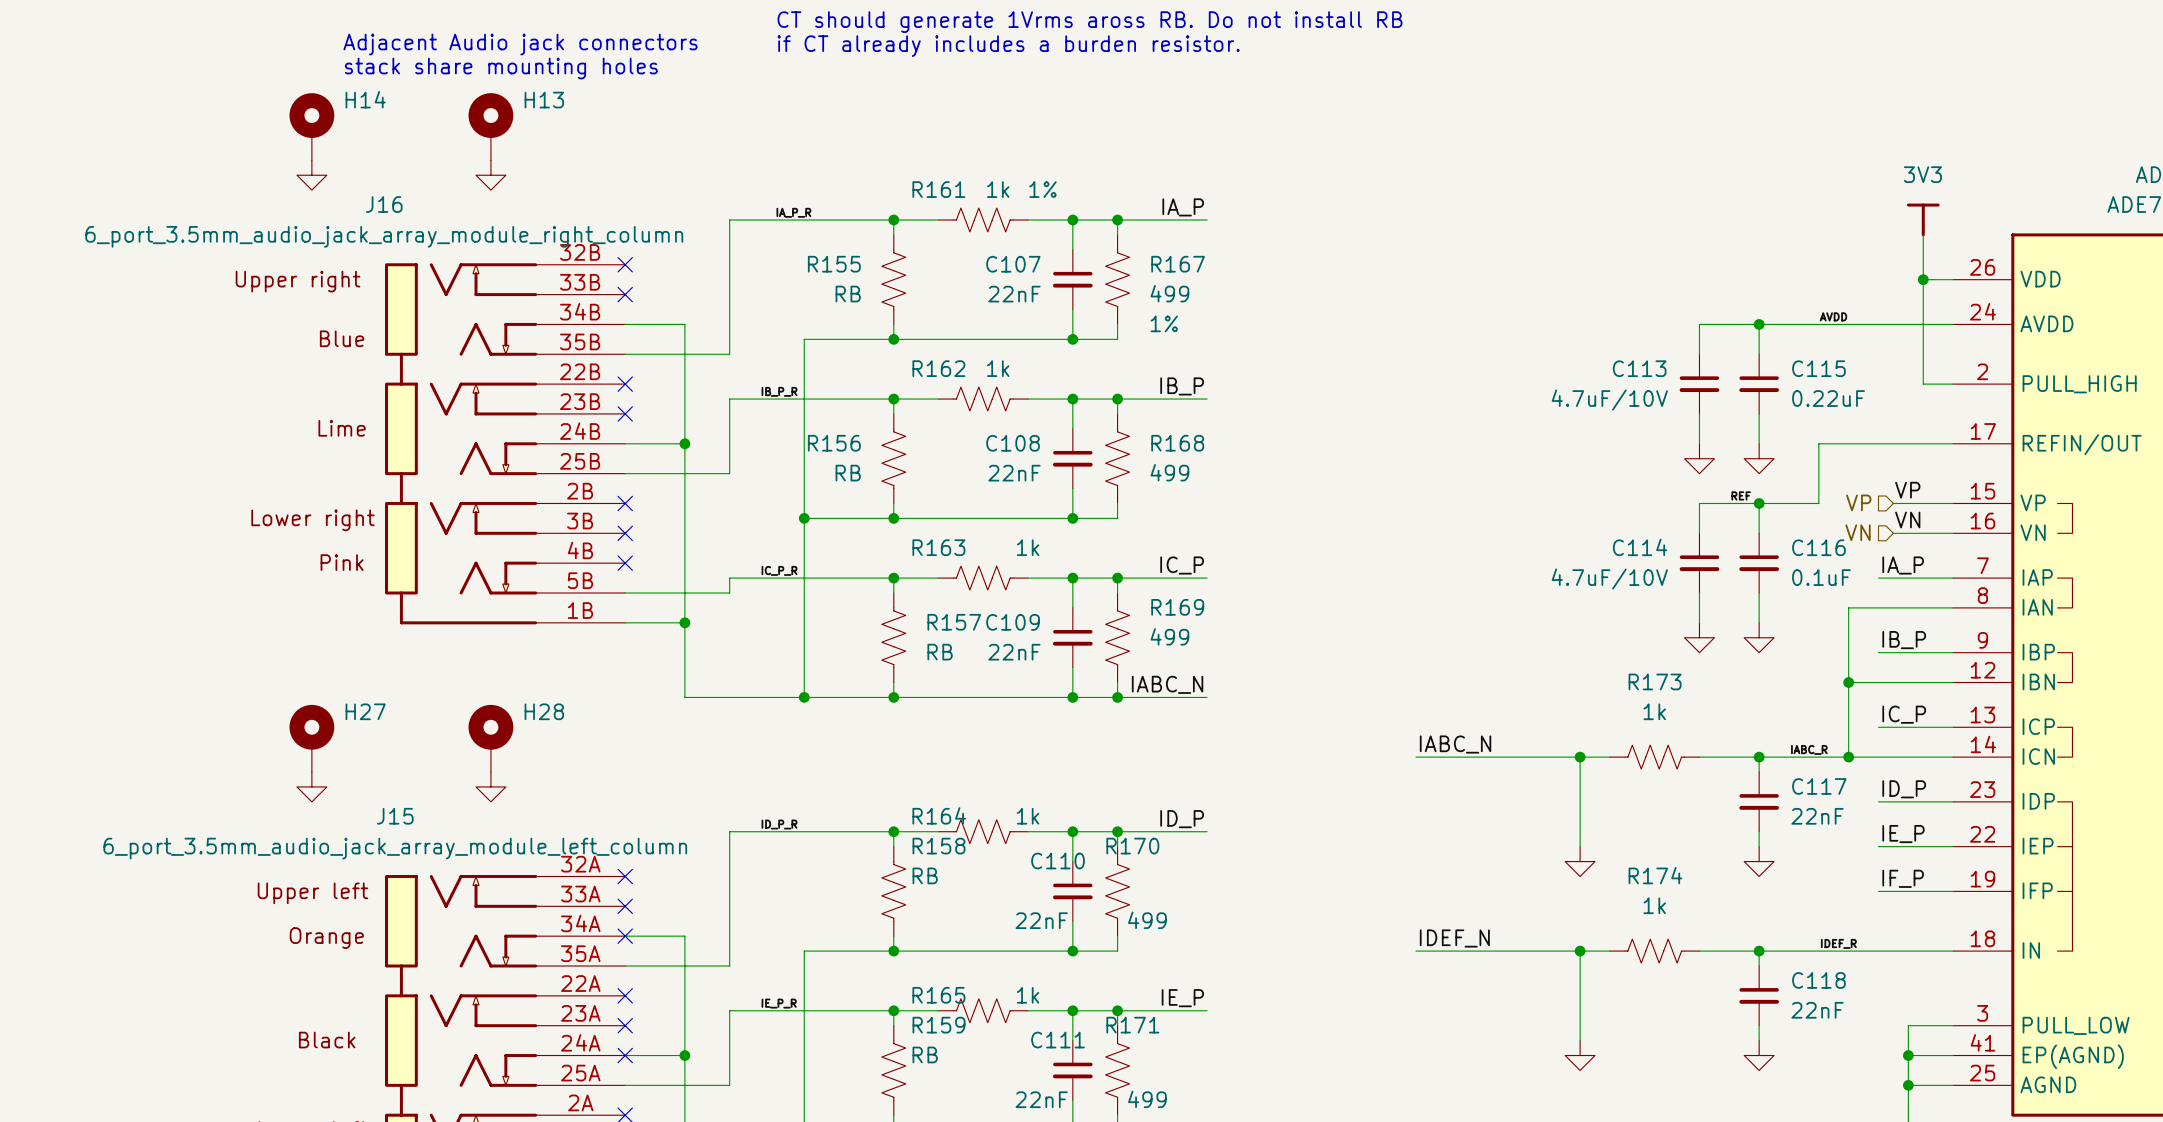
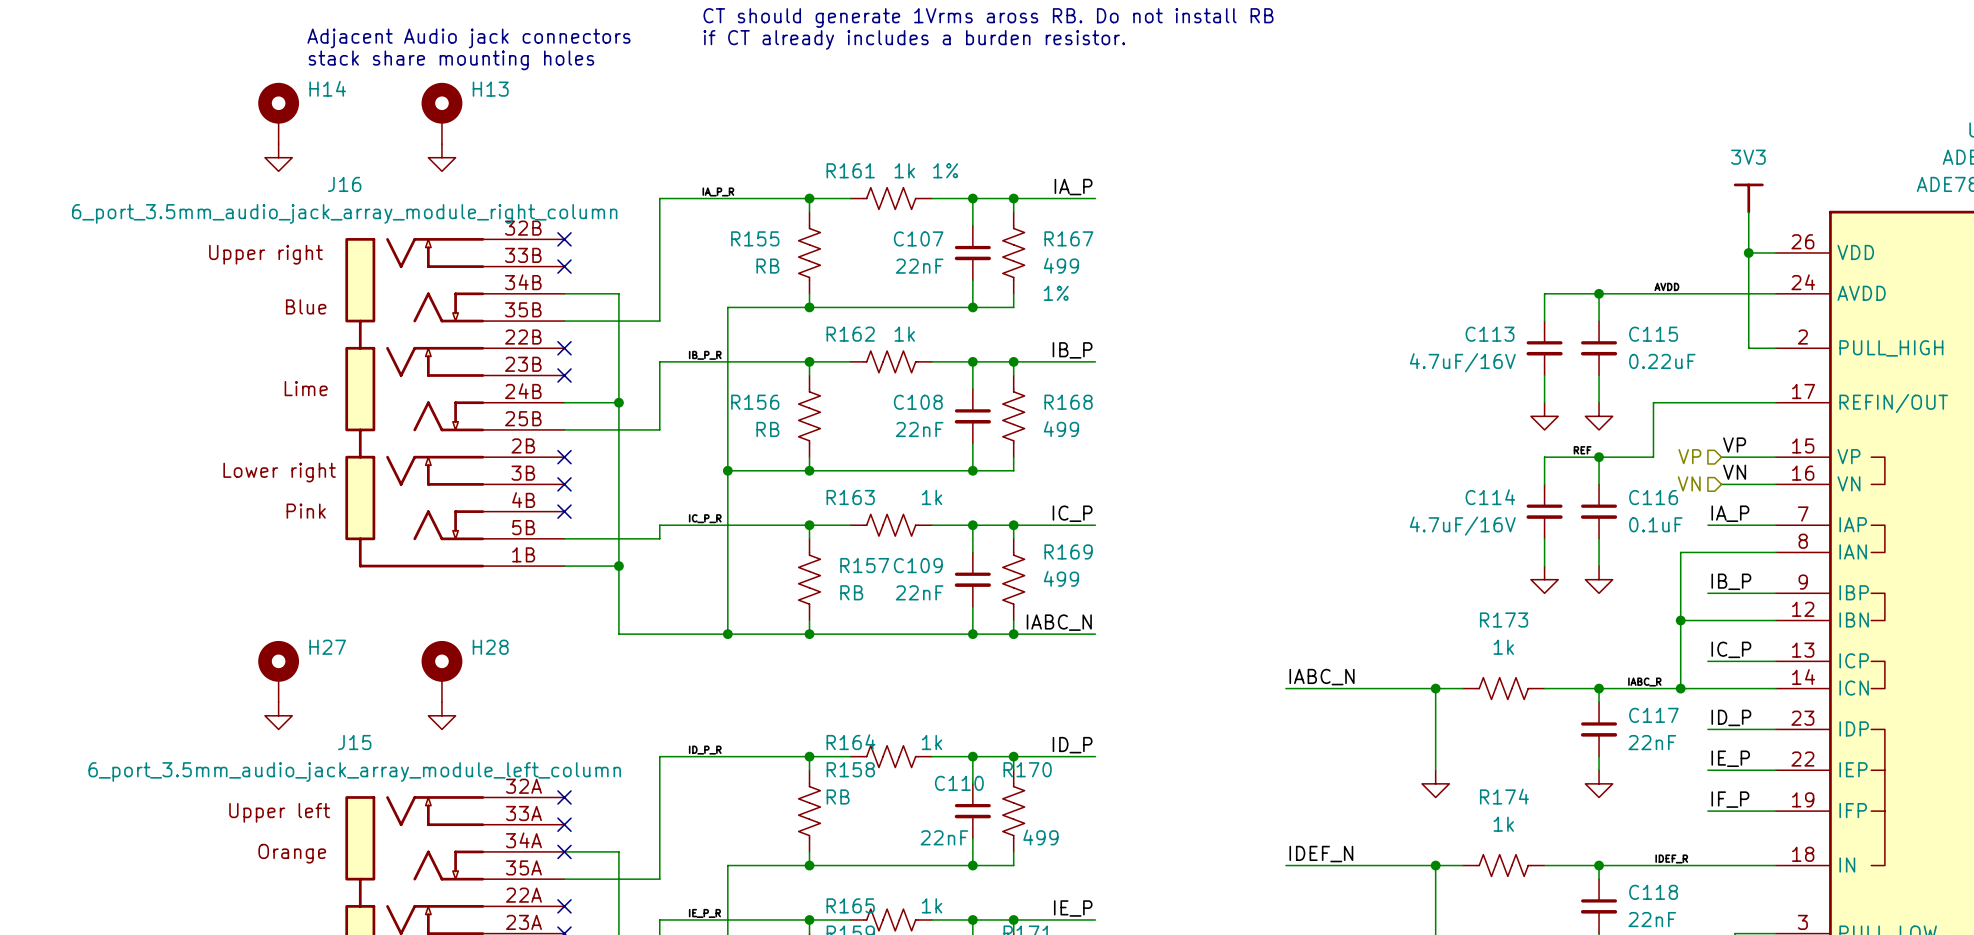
C113 value: 4.7uF/10V (1609, 399) -> 4.7uF/16V (1462, 362)
C114 value: 4.7uF/10V (1609, 579) -> 4.7uF/16V (1462, 526)

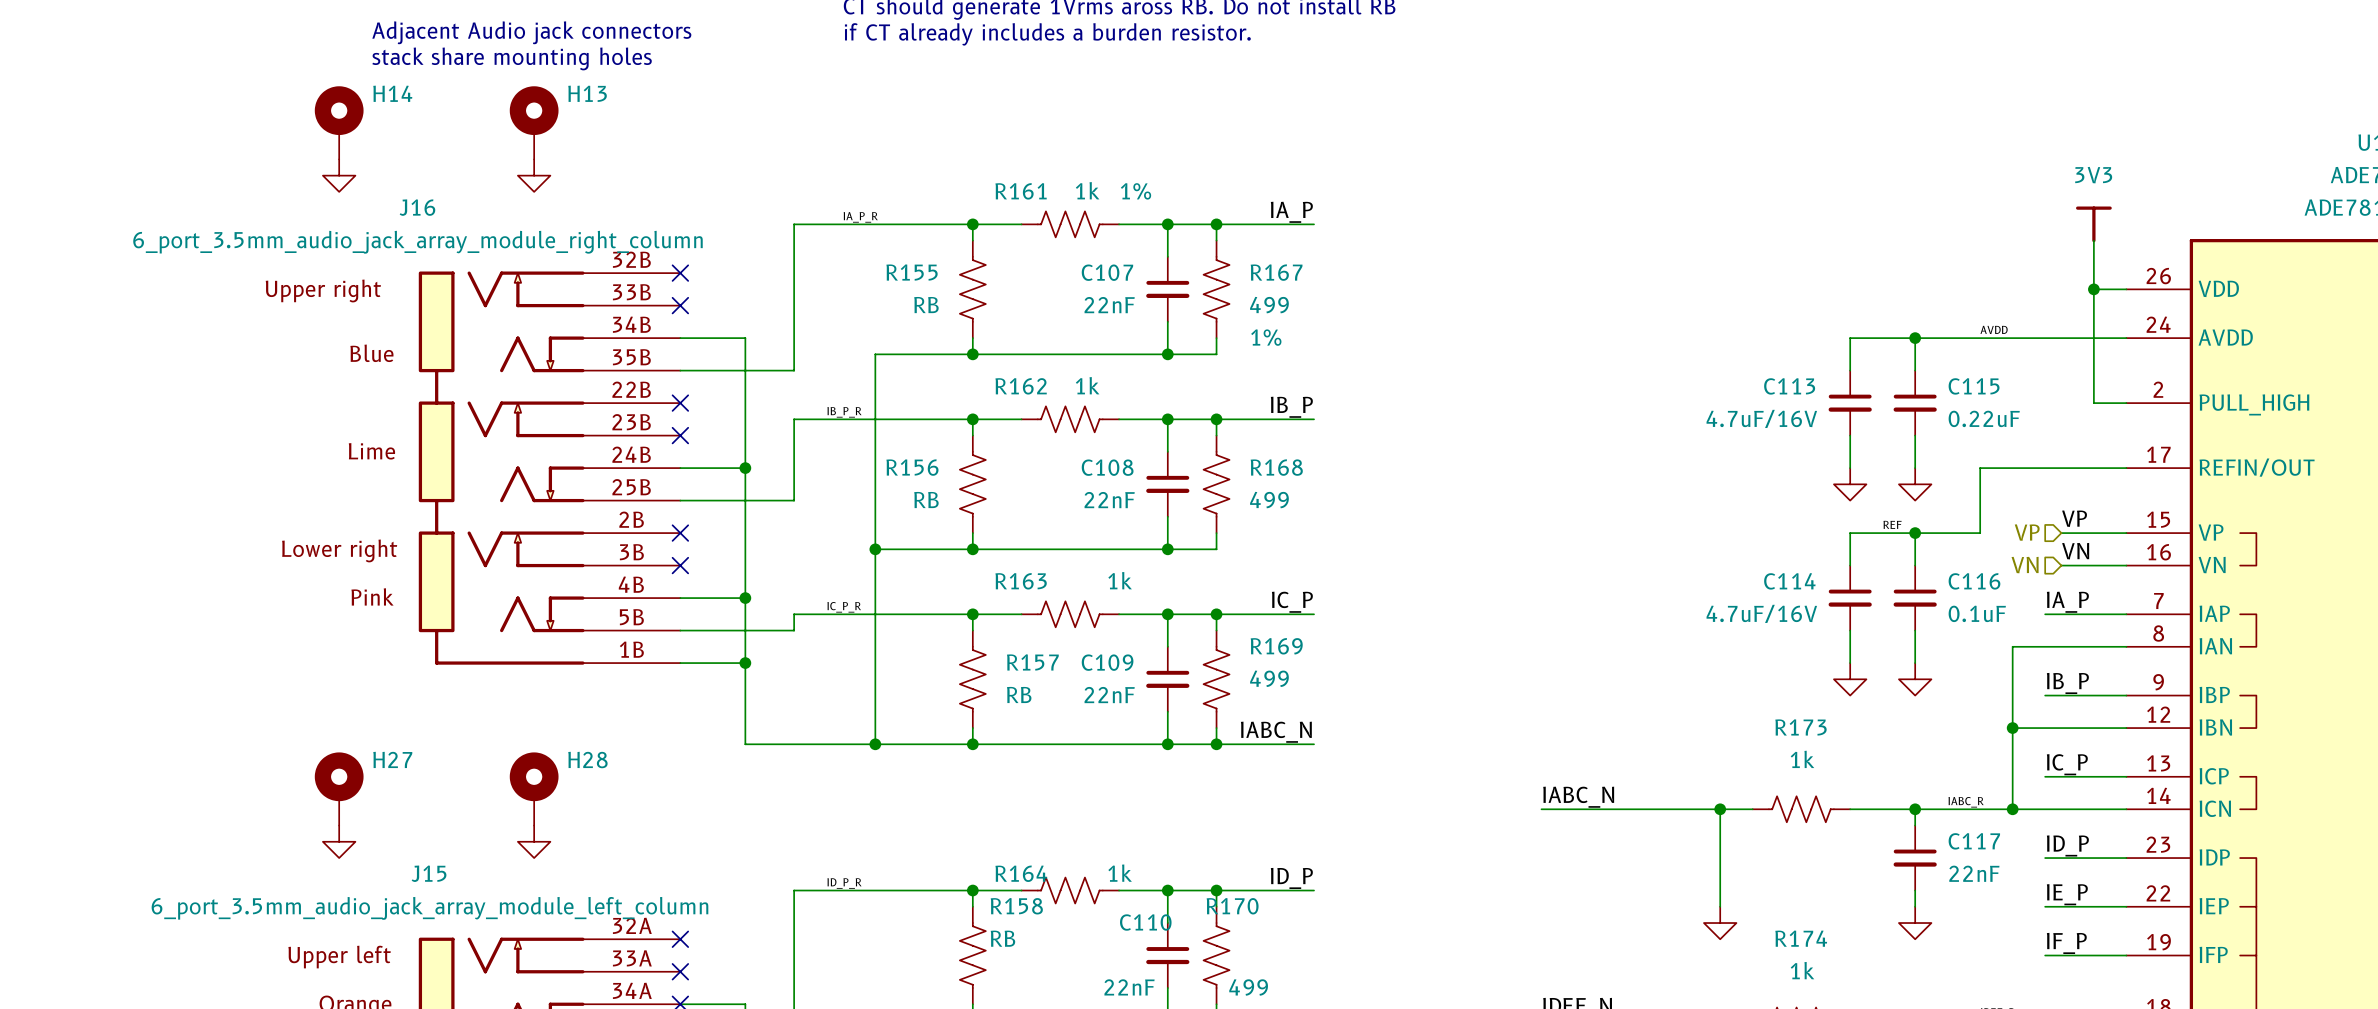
wire: none -> (680, 598) (745, 598)
no-connect mark: (564, 511) -> none
junction: none -> (745, 598)

